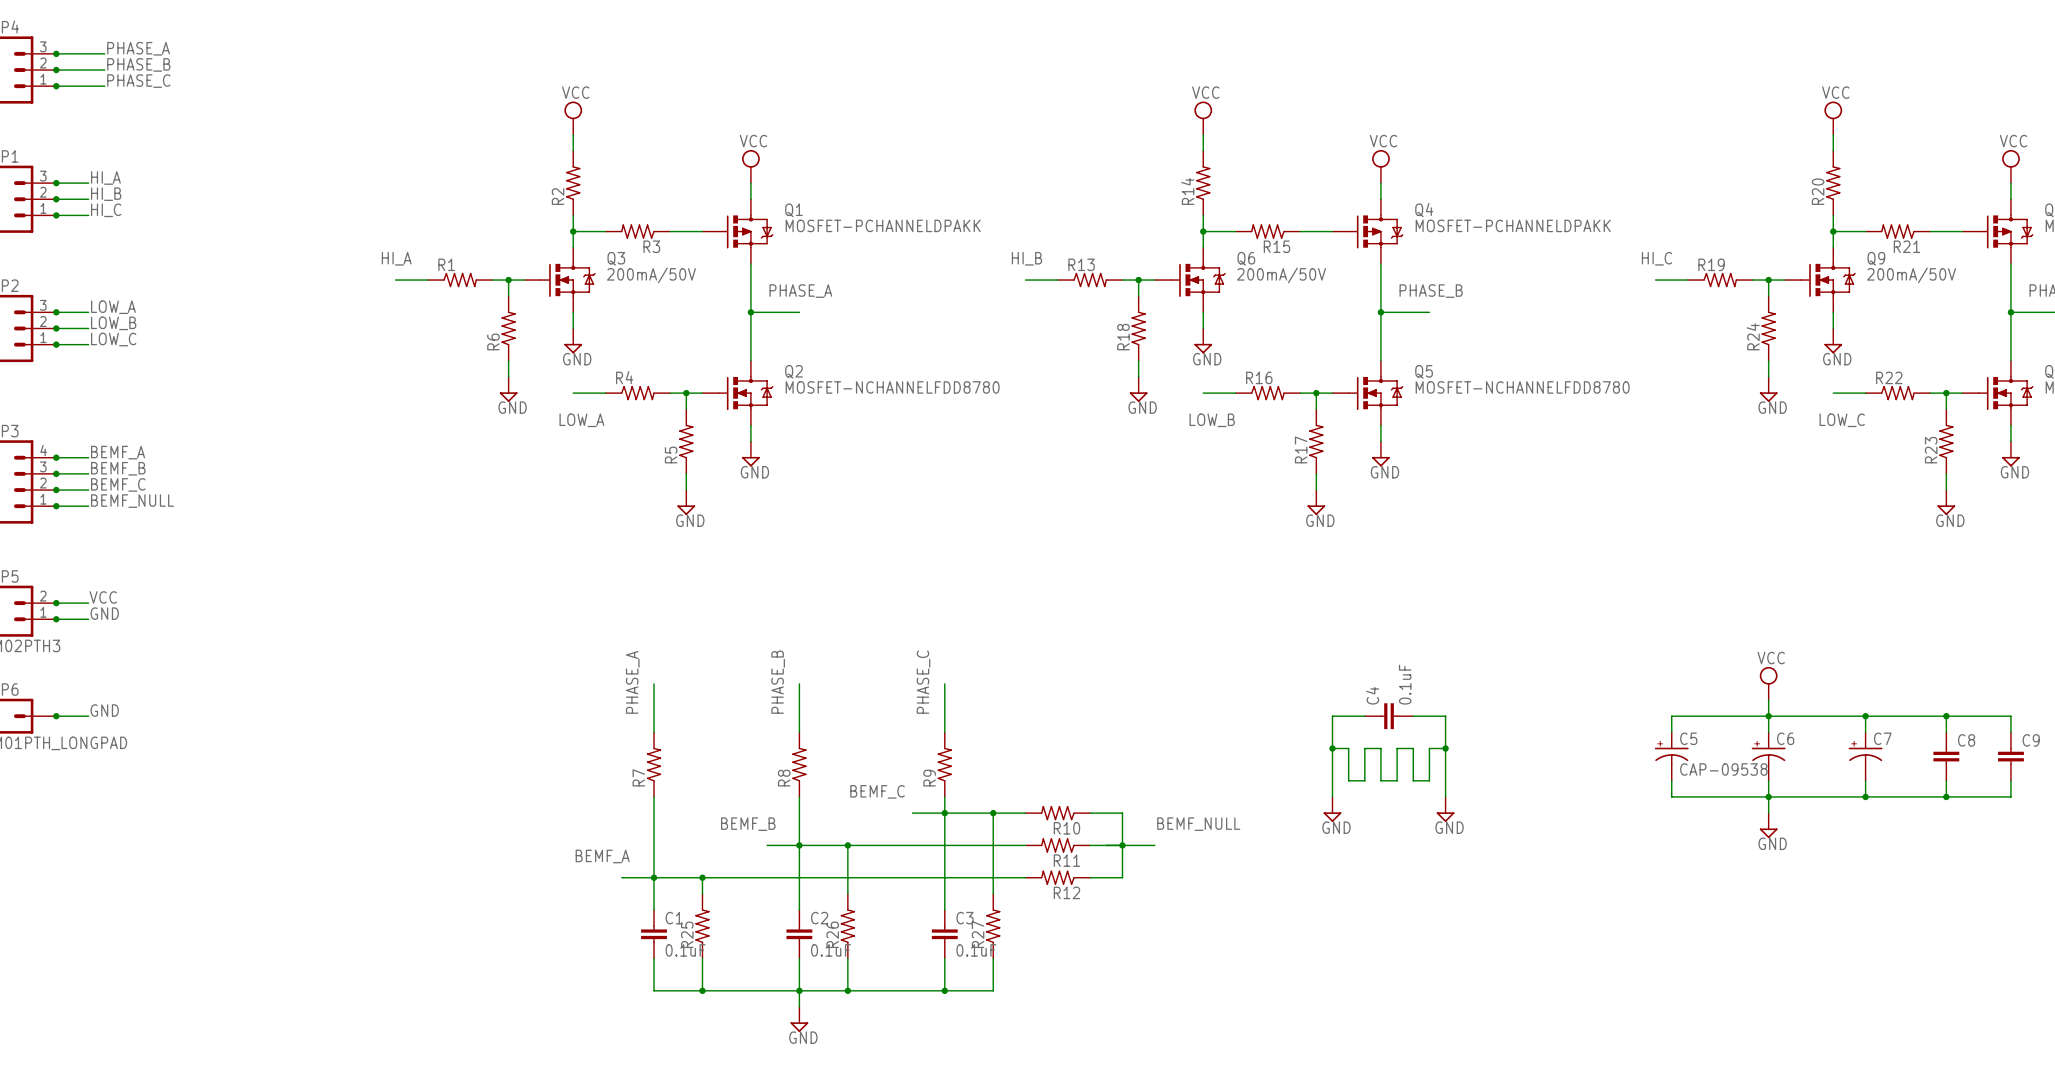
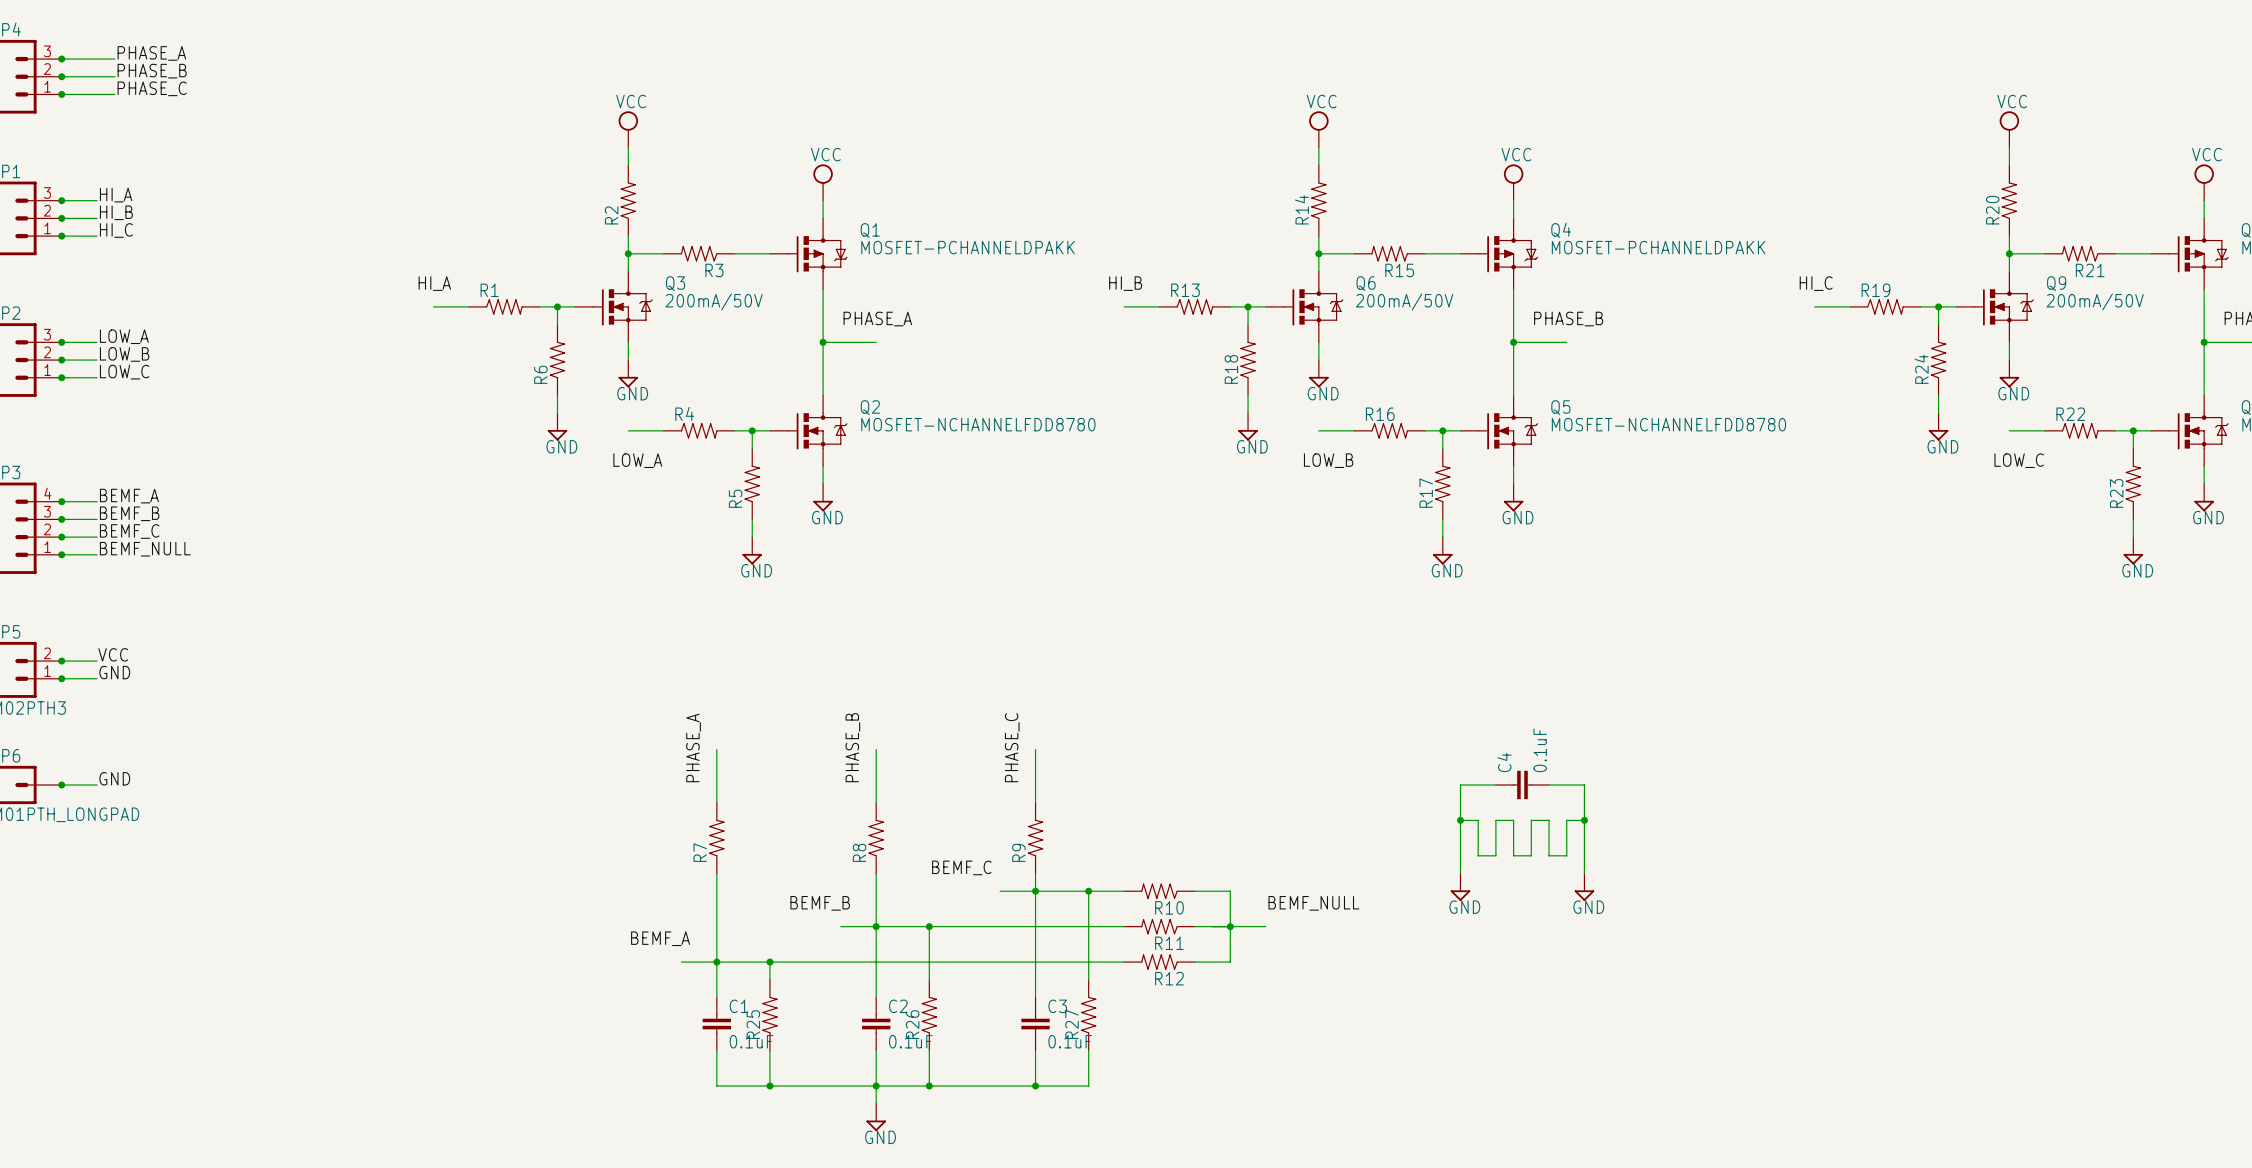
power symbol: VCC (1768, 683) -> none
wire: (1768, 700) (1768, 732) -> none
junction: (1768, 716) -> none
wire: (1865, 716) (1865, 732) -> none
junction: (1865, 716) -> none
wire: (1946, 716) (1946, 732) -> none
junction: (1946, 716) -> none
wire: (1671, 732) (1671, 716) (2010, 716) (2010, 732) -> none
C5: CAP-09538 (1671, 756) -> none
C6: (1768, 756) -> none
C7: (1865, 756) -> none
C8: (1946, 756) -> none
C9: (2010, 756) -> none
wire: (1671, 780) (1671, 796) (2010, 796) (2010, 780) -> none
wire: (1768, 780) (1768, 813) -> none
wire: (1865, 780) (1865, 796) -> none
wire: (1946, 780) (1946, 796) -> none
junction: (1768, 796) -> none
junction: (1865, 796) -> none
junction: (1946, 796) -> none
power symbol: GND (1768, 825) -> none

